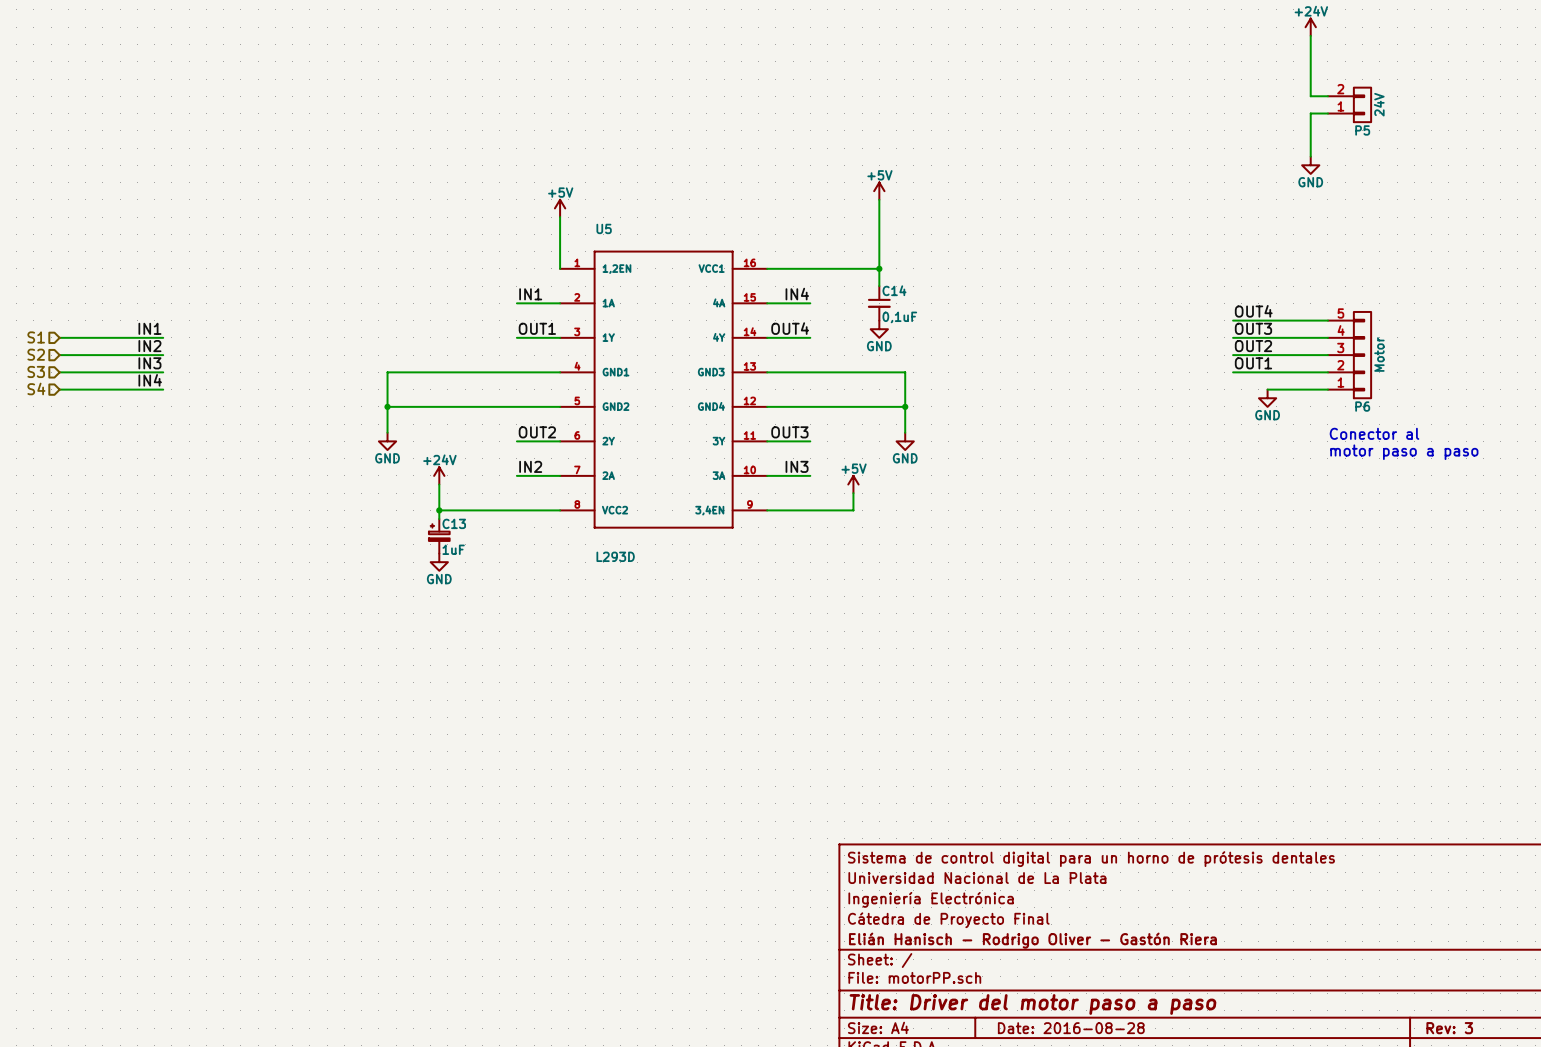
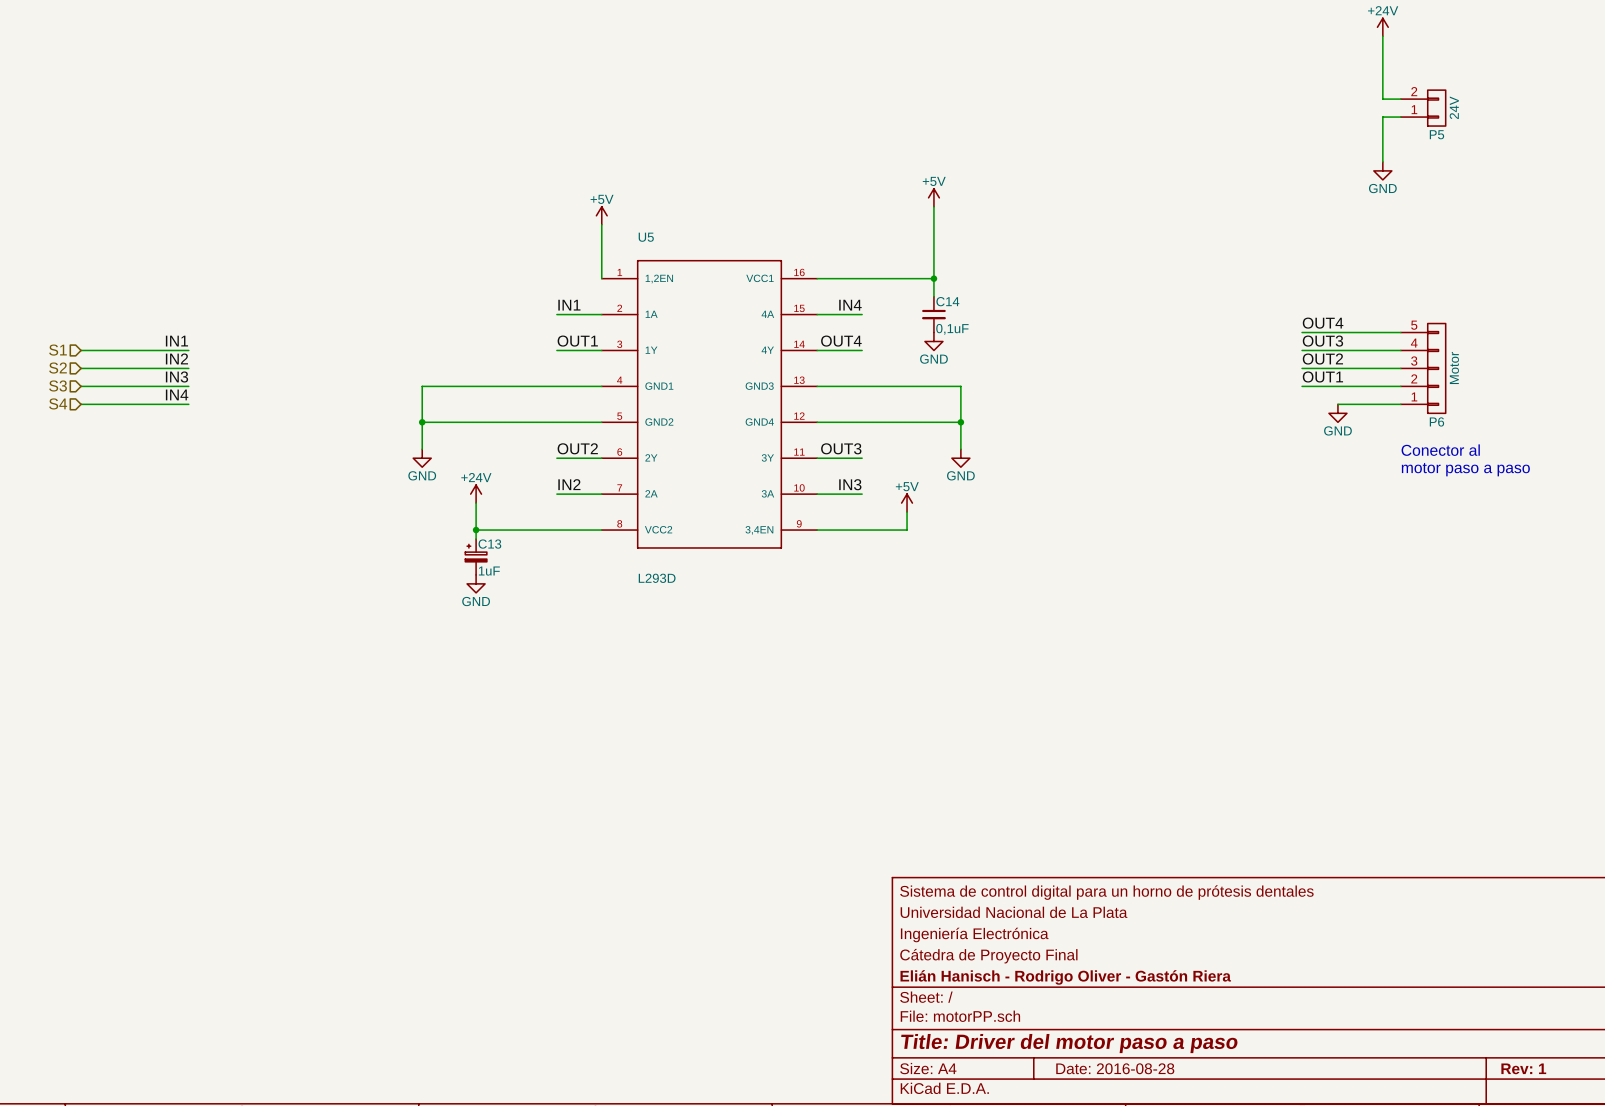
title block: Rev: 3 (1449, 1028) -> Rev: 1 (1523, 1068)

